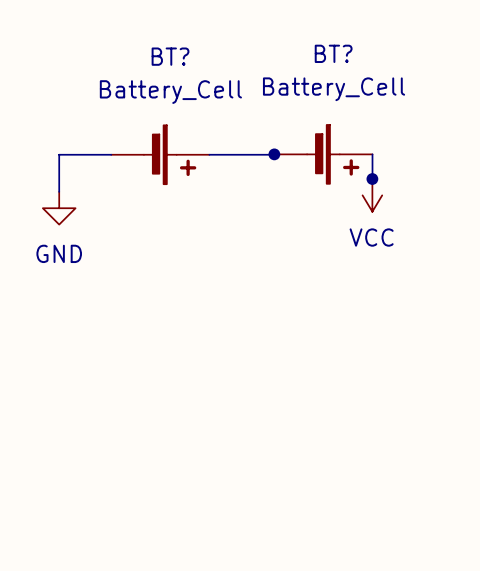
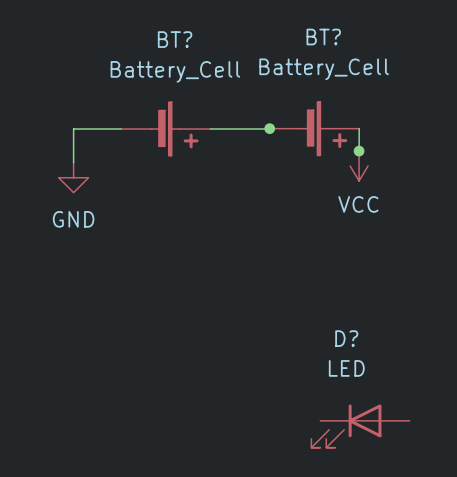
D?: none -> LED (360, 426)

